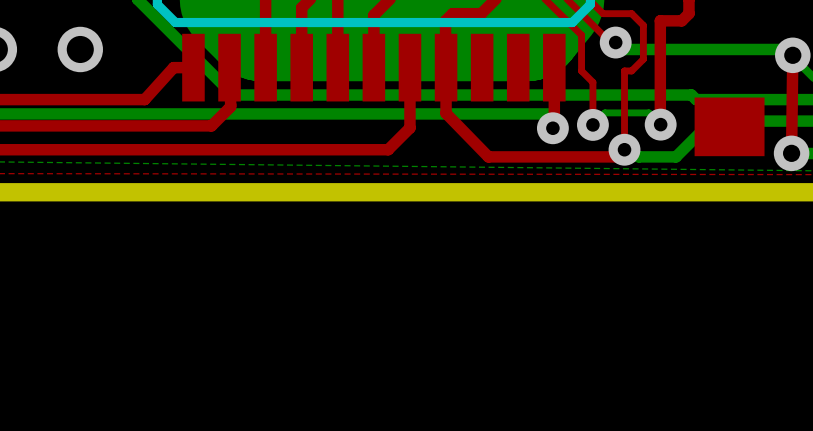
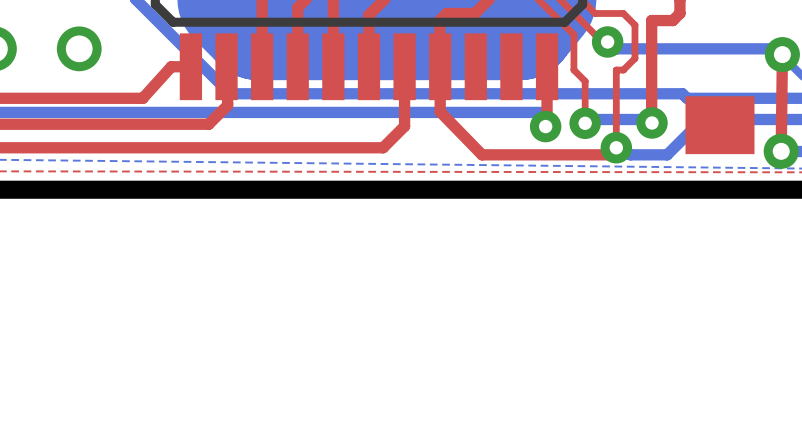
bottom track: none -> (588, 119) (651, 119)
bottom track: (660, 124) (648, 112) (604, 112) (592, 124) -> none

